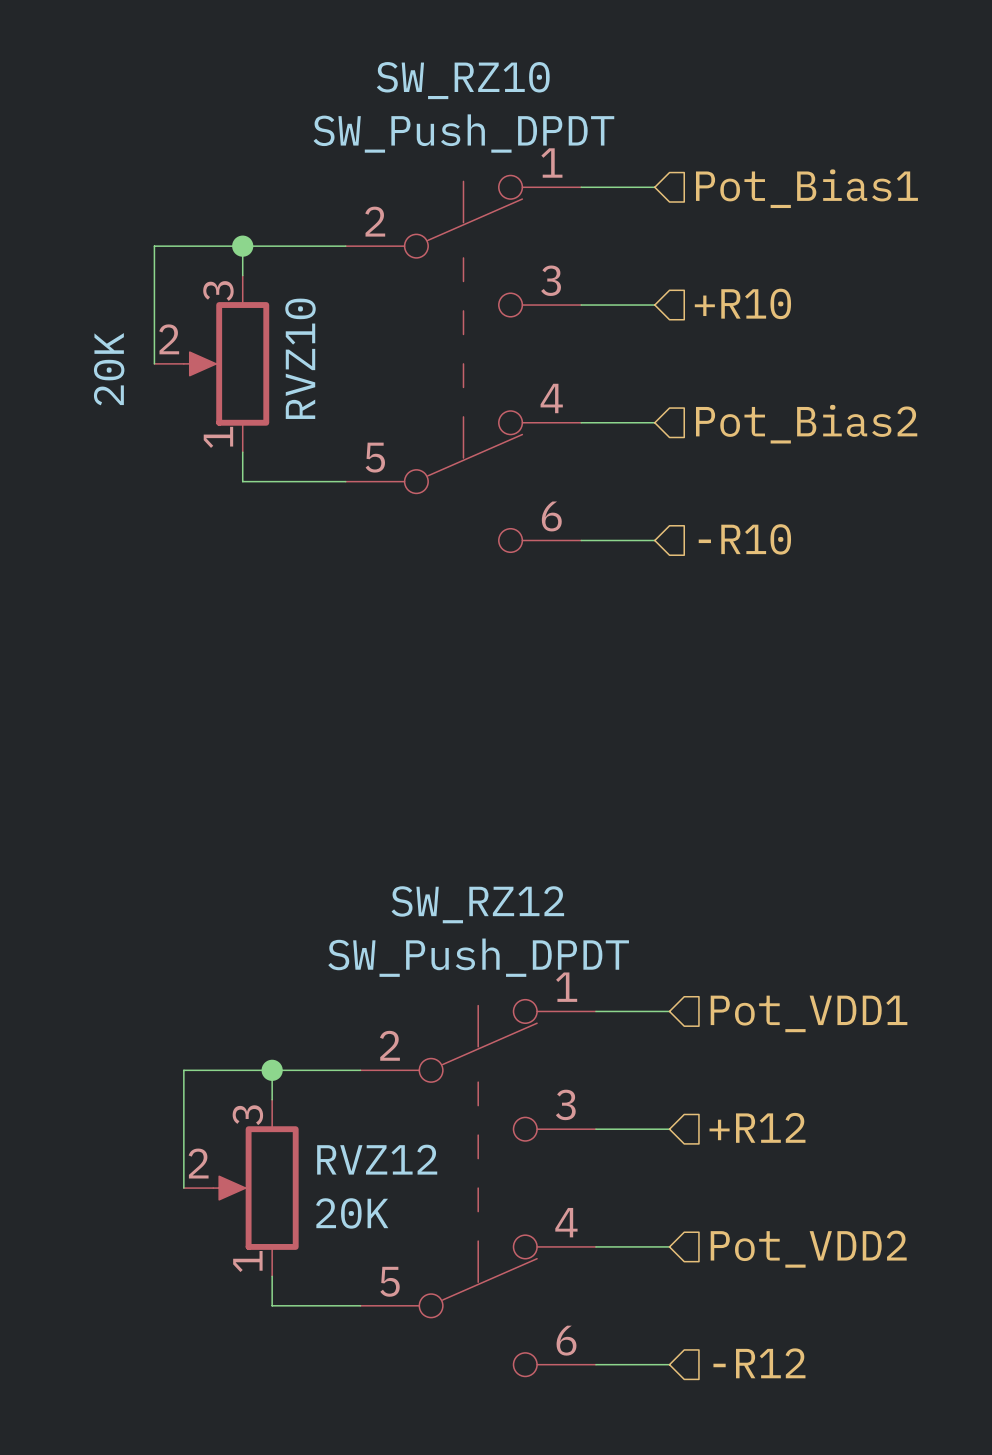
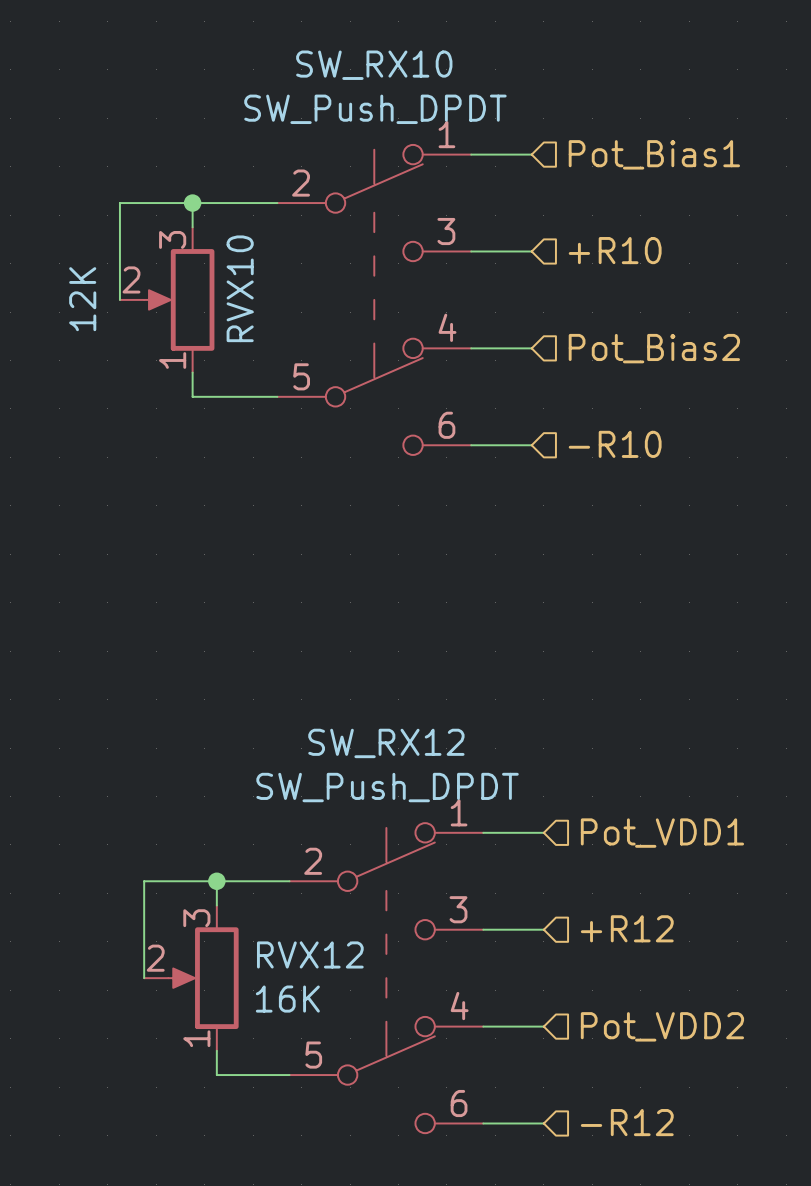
SW_RZ10 name: SW_RZ10 (463, 80) -> SW_RX10 (374, 65)
RVZ10 name: RVZ10 (300, 358) -> RVX10 (240, 288)
RVZ10 value: 20K (109, 369) -> 12K (82, 299)
SW_RZ12 name: SW_RZ12 (477, 904) -> SW_RX12 (386, 743)
RVZ12 name: RVZ12 (377, 1159) -> RVX12 (310, 954)
RVZ12 value: 20K (352, 1213) -> 16K (287, 999)

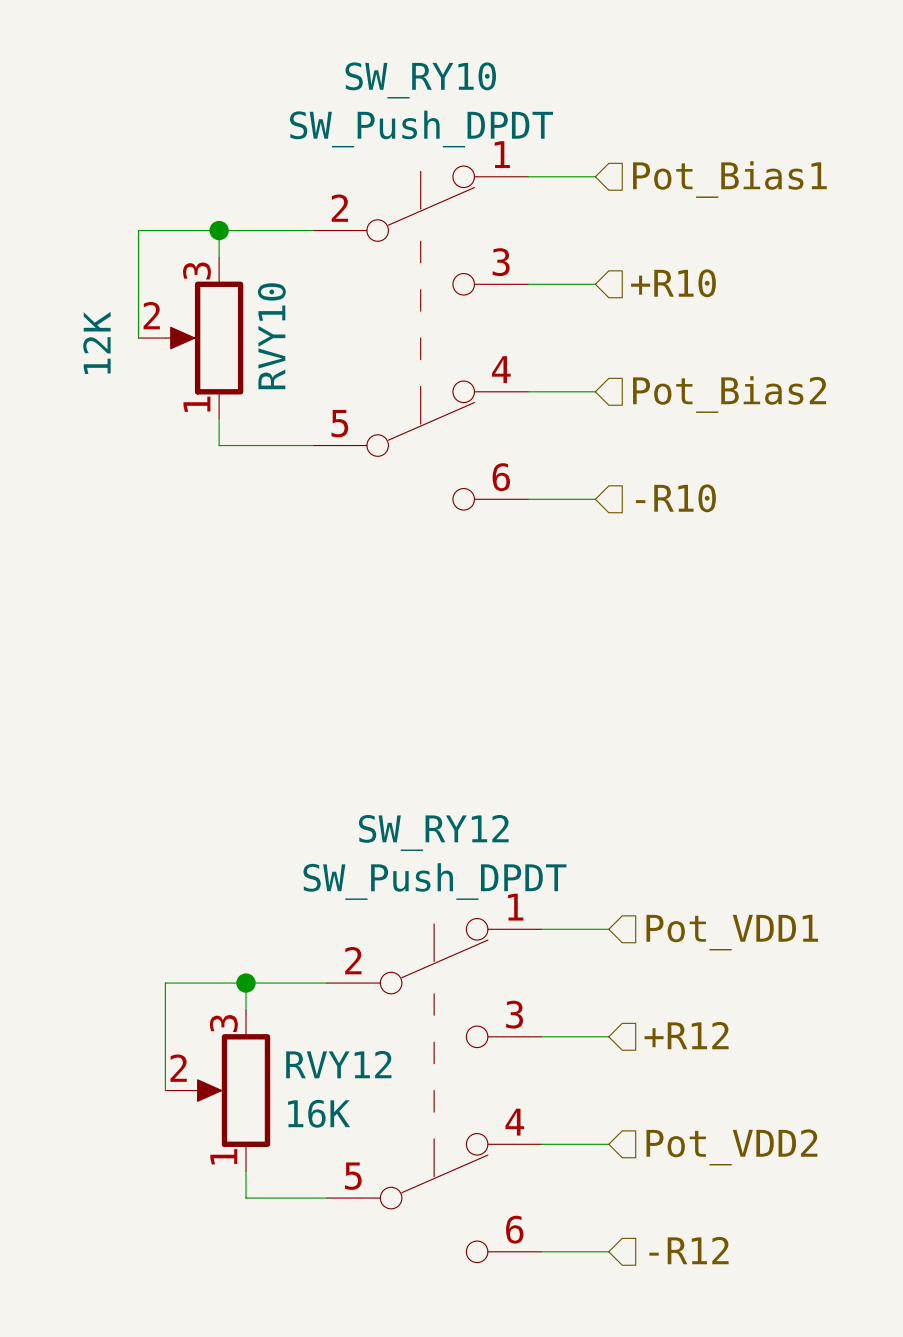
SW_RX10 name: SW_RX10 (374, 65) -> SW_RY10 (420, 80)
RVX10 name: RVX10 (240, 288) -> RVY10 (271, 336)
SW_RX12 name: SW_RX12 (386, 743) -> SW_RY12 (433, 832)
RVX12 name: RVX12 (310, 954) -> RVY12 (338, 1064)

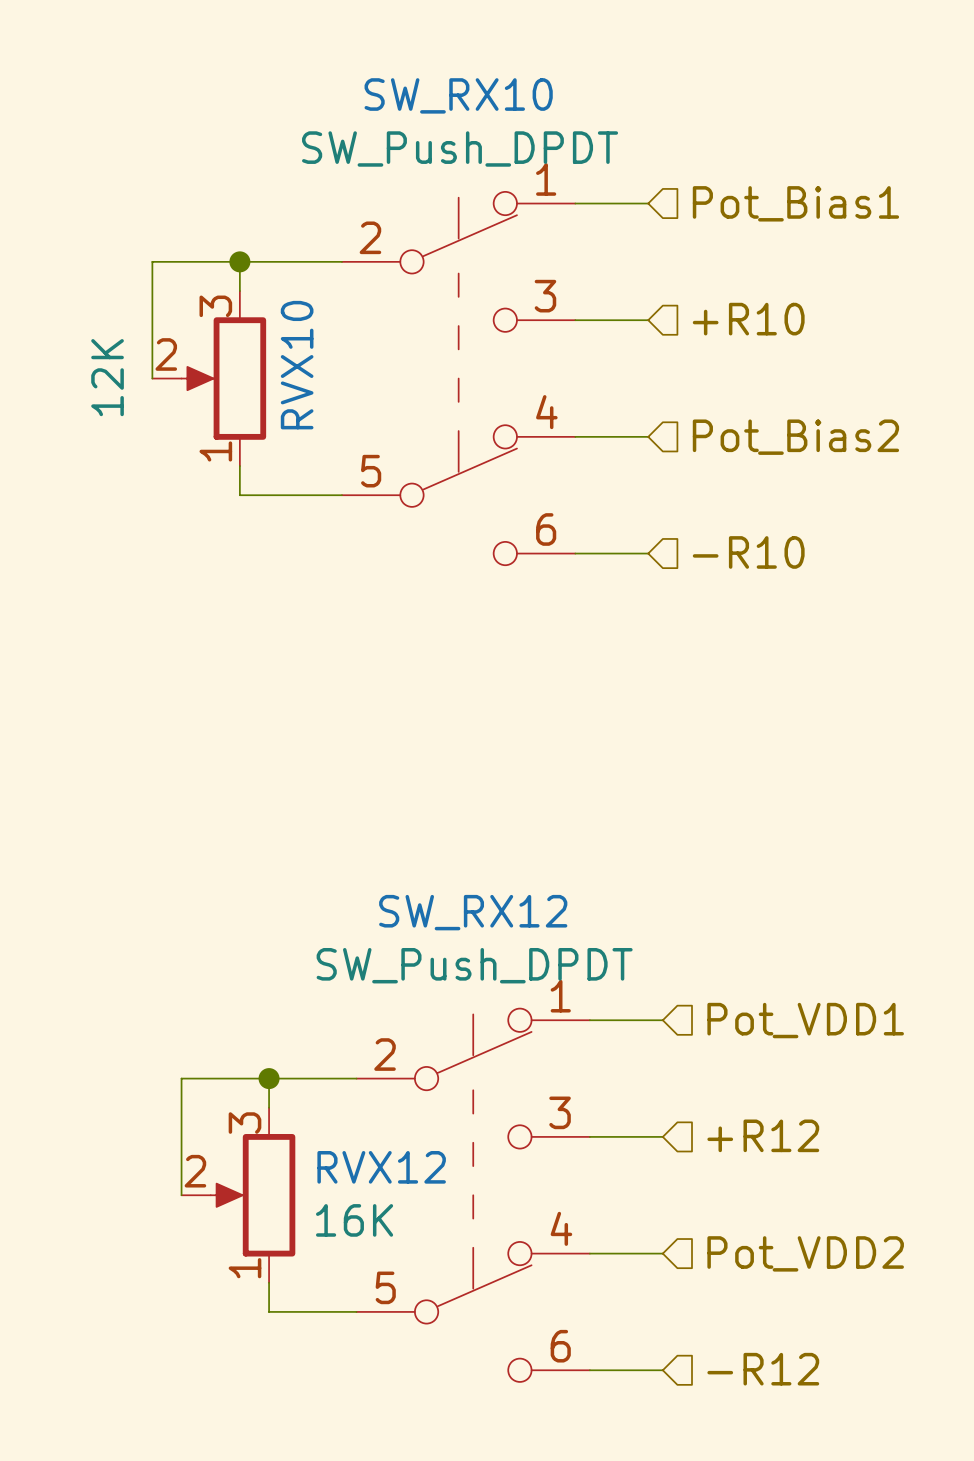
SW_RY10 name: SW_RY10 (420, 80) -> SW_RX10 (458, 95)
RVY10 name: RVY10 (271, 336) -> RVX10 (297, 365)
SW_RY12 name: SW_RY12 (433, 832) -> SW_RX12 (473, 912)
RVY12 name: RVY12 (338, 1064) -> RVX12 (381, 1167)

